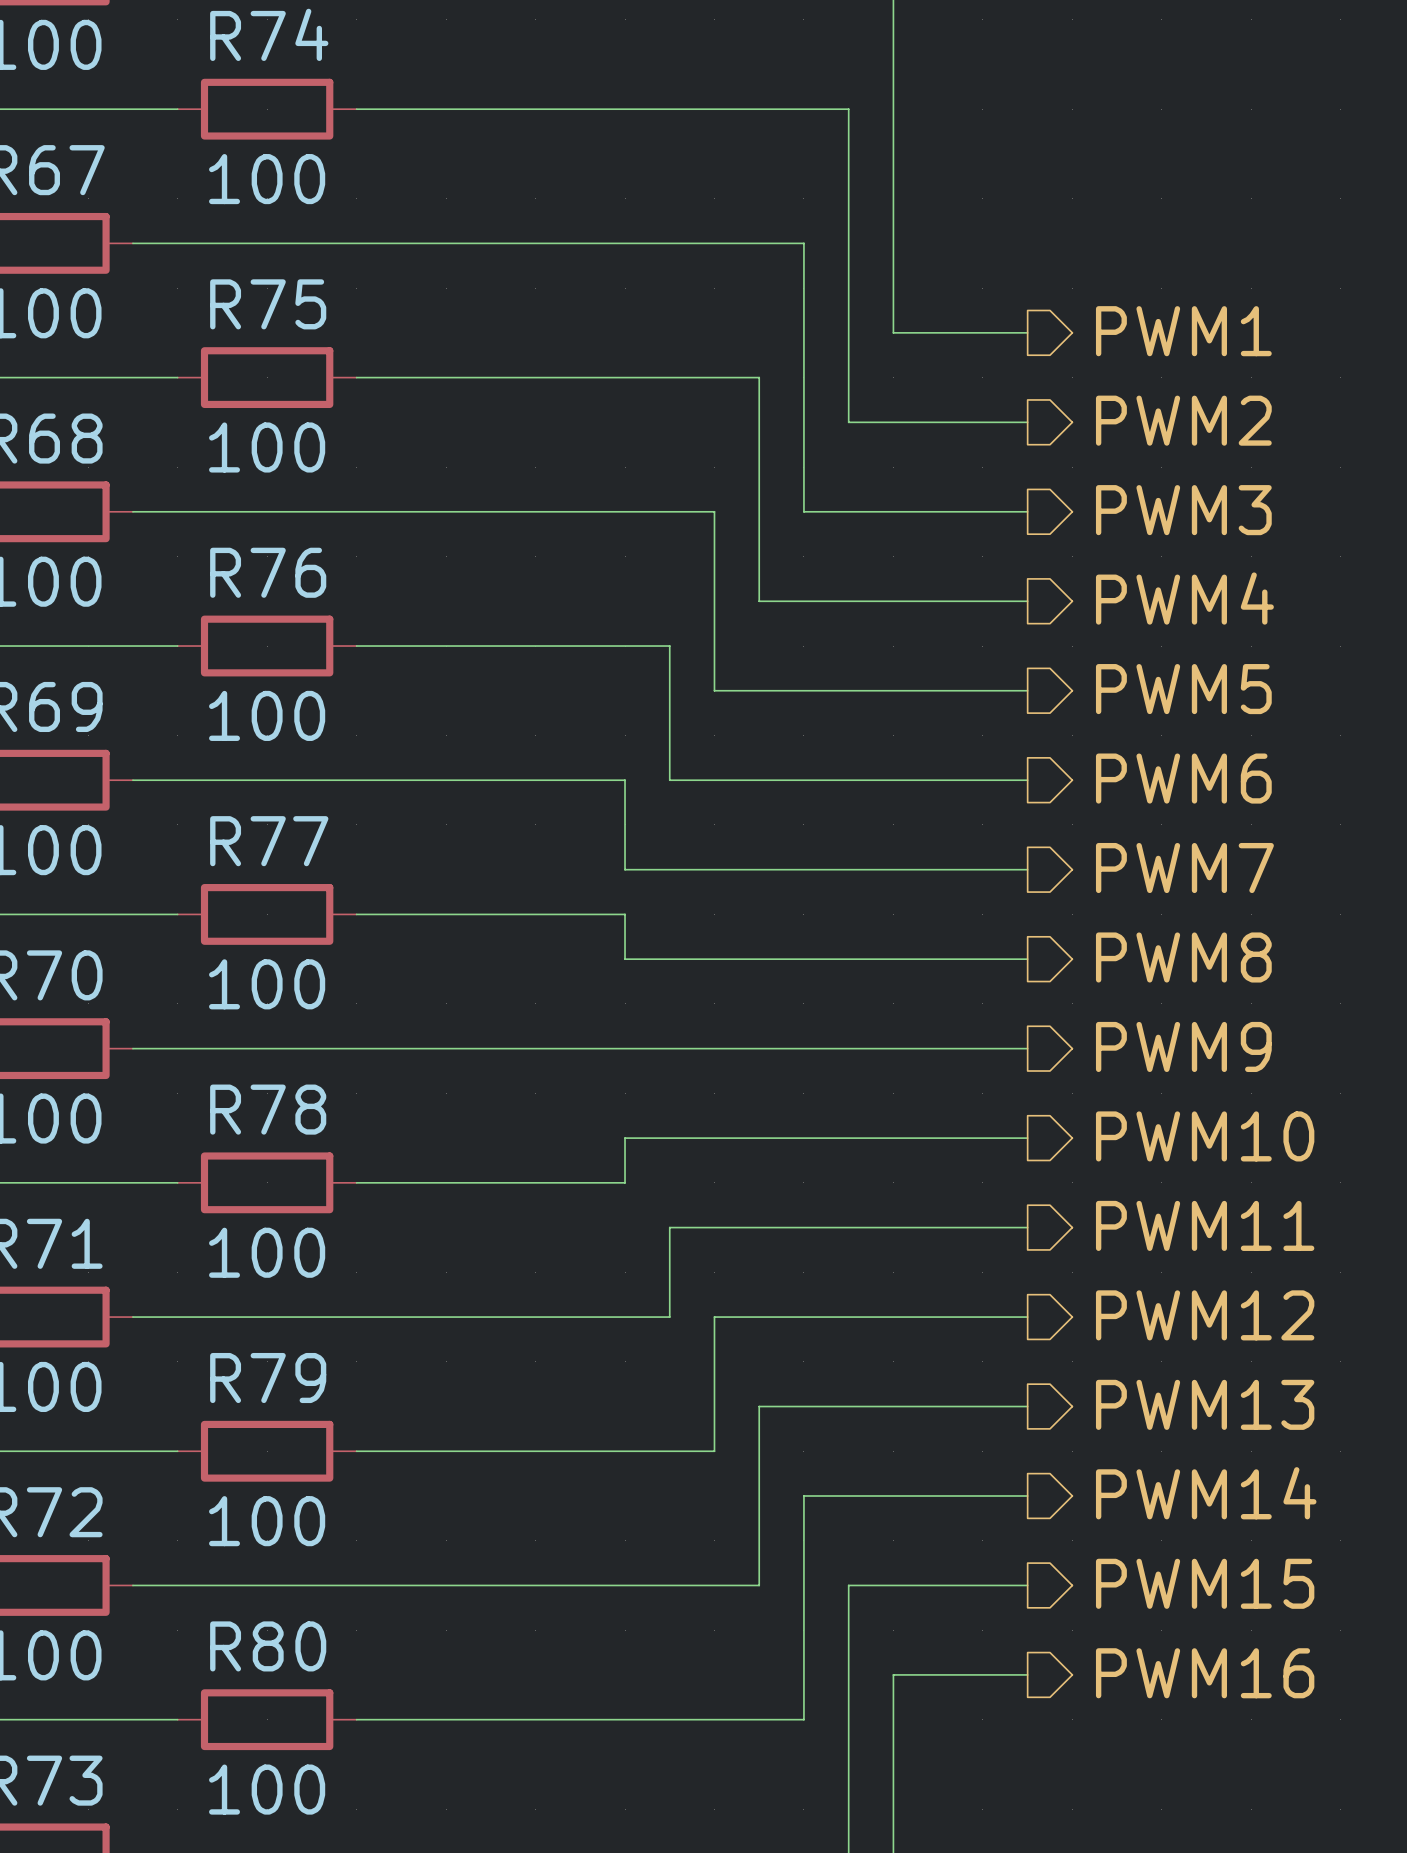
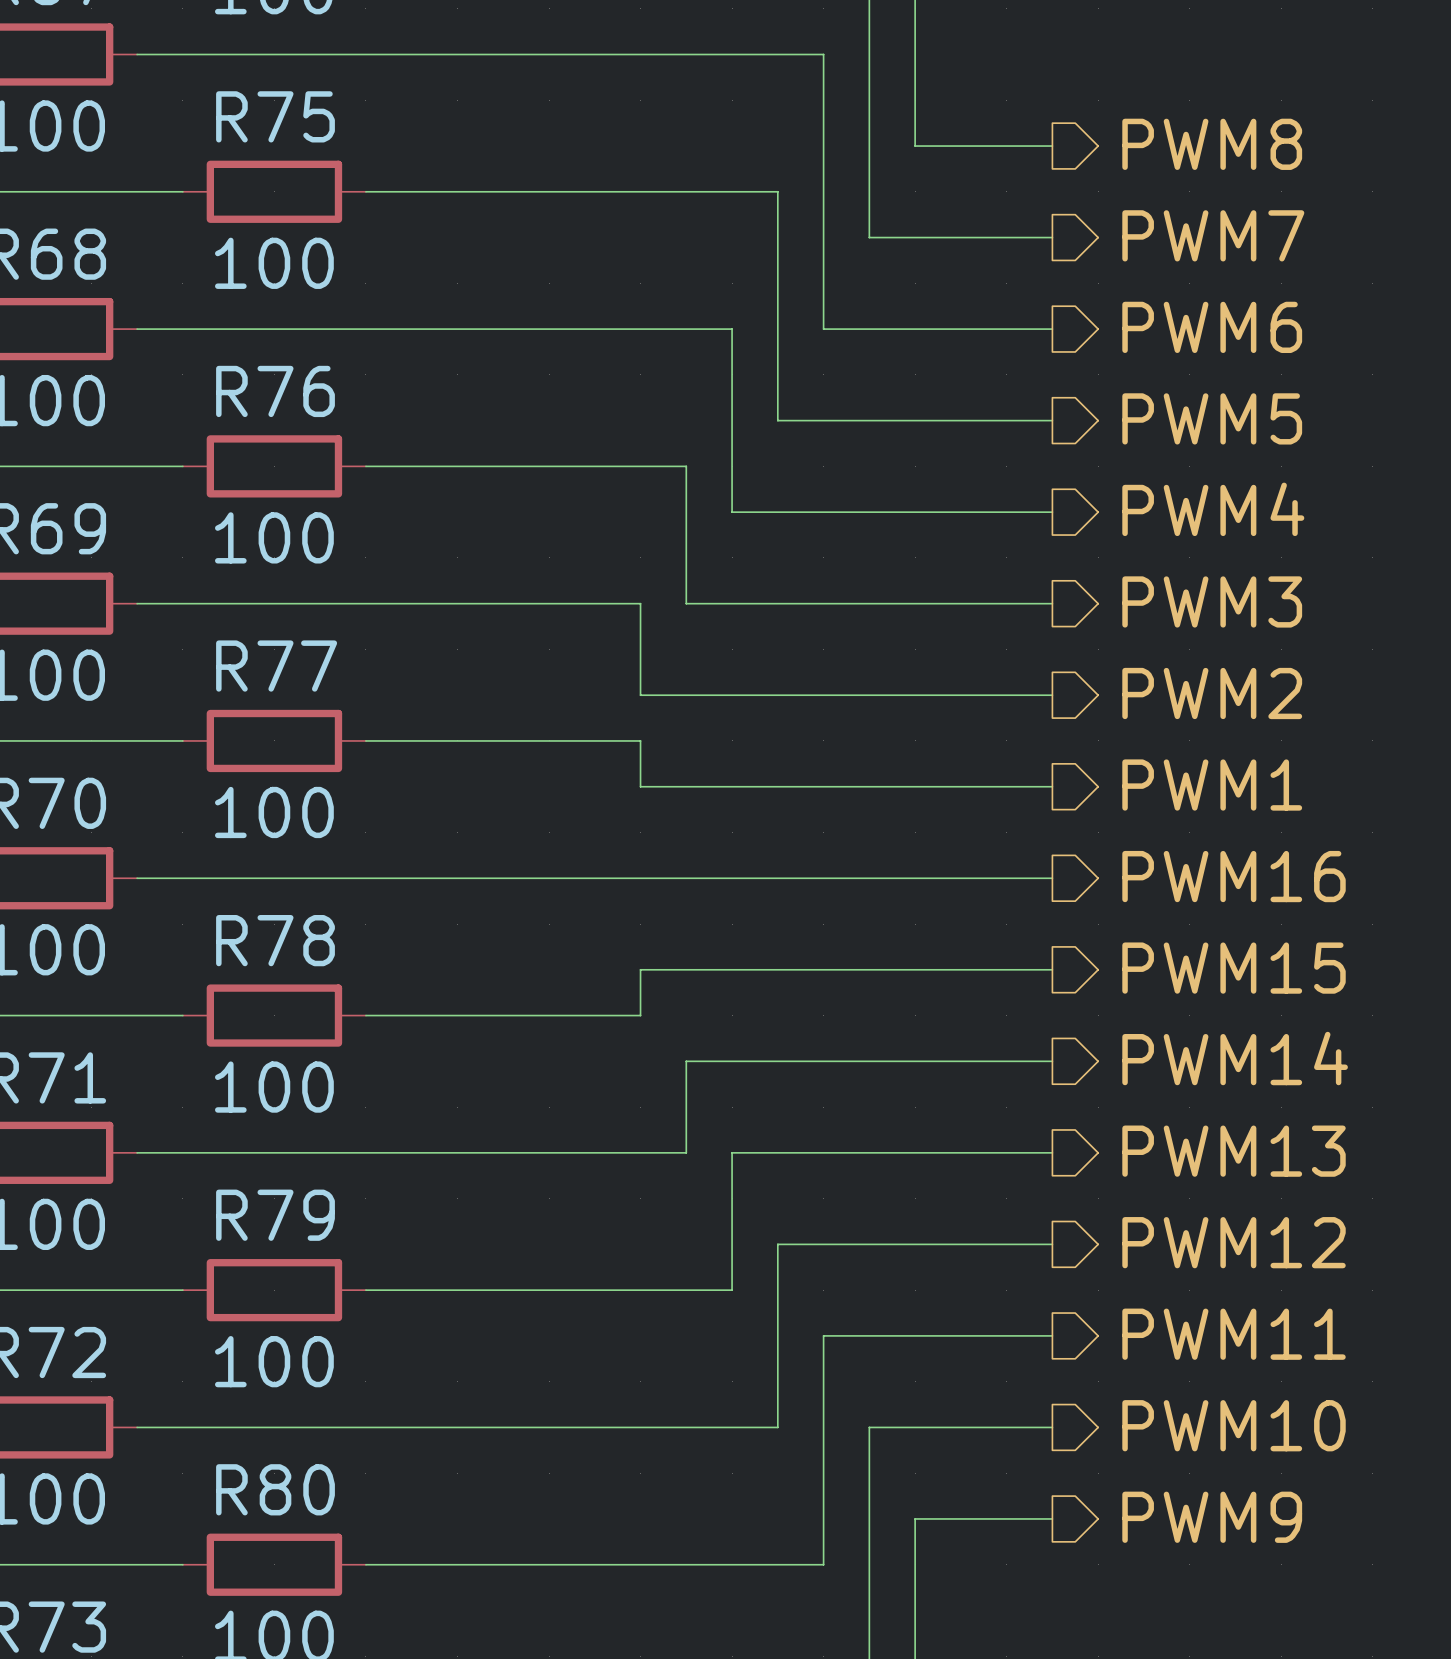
hierarchical label: PWM1 (1183, 331) -> PWM8 (1212, 144)
hierarchical label: PWM2 (1183, 420) -> PWM7 (1213, 235)
hierarchical label: PWM3 (1183, 510) -> PWM6 (1212, 327)
hierarchical label: PWM4 (1184, 598) -> PWM5 (1212, 418)
hierarchical label: PWM5 (1183, 689) -> PWM4 (1213, 509)
hierarchical label: PWM6 (1183, 778) -> PWM3 (1212, 601)
hierarchical label: PWM7 (1184, 868) -> PWM2 (1212, 693)
hierarchical label: PWM8 (1183, 957) -> PWM1 (1212, 785)
hierarchical label: PWM9 (1183, 1046) -> PWM16 (1234, 876)
hierarchical label: PWM10 (1205, 1136) -> PWM15 (1234, 968)
hierarchical label: PWM11 (1205, 1225) -> PWM14 (1235, 1058)
hierarchical label: PWM12 (1205, 1315) -> PWM13 (1234, 1151)
hierarchical label: PWM13 (1205, 1404) -> PWM12 (1234, 1242)
hierarchical label: PWM14 (1206, 1493) -> PWM11 (1234, 1334)
hierarchical label: PWM15 (1205, 1583) -> PWM10 (1234, 1425)
hierarchical label: PWM16 (1205, 1673) -> PWM9 (1212, 1517)

